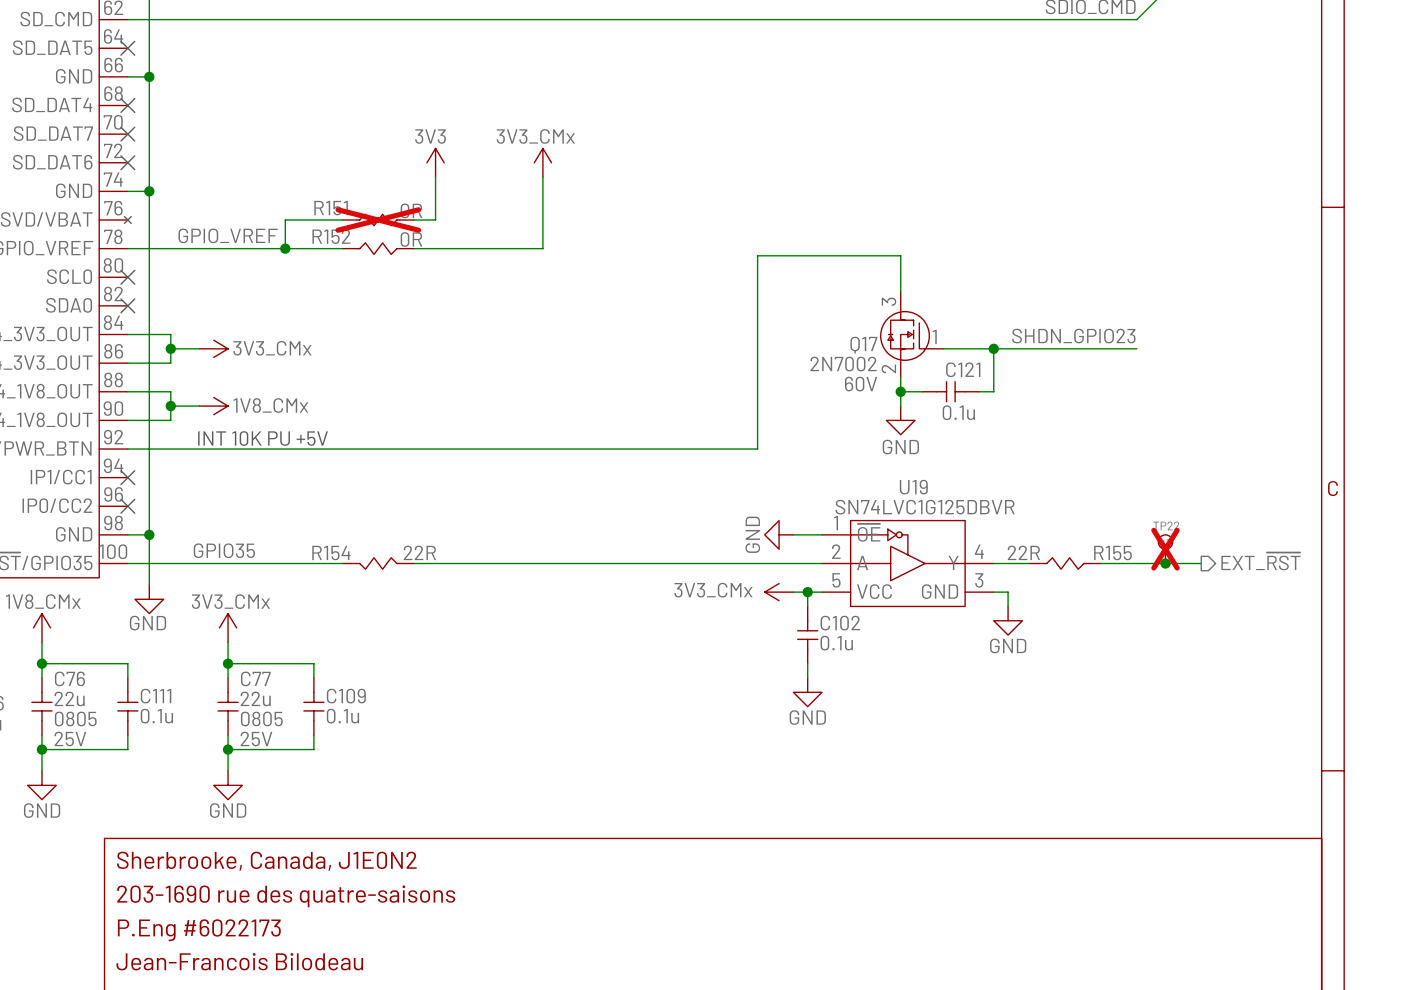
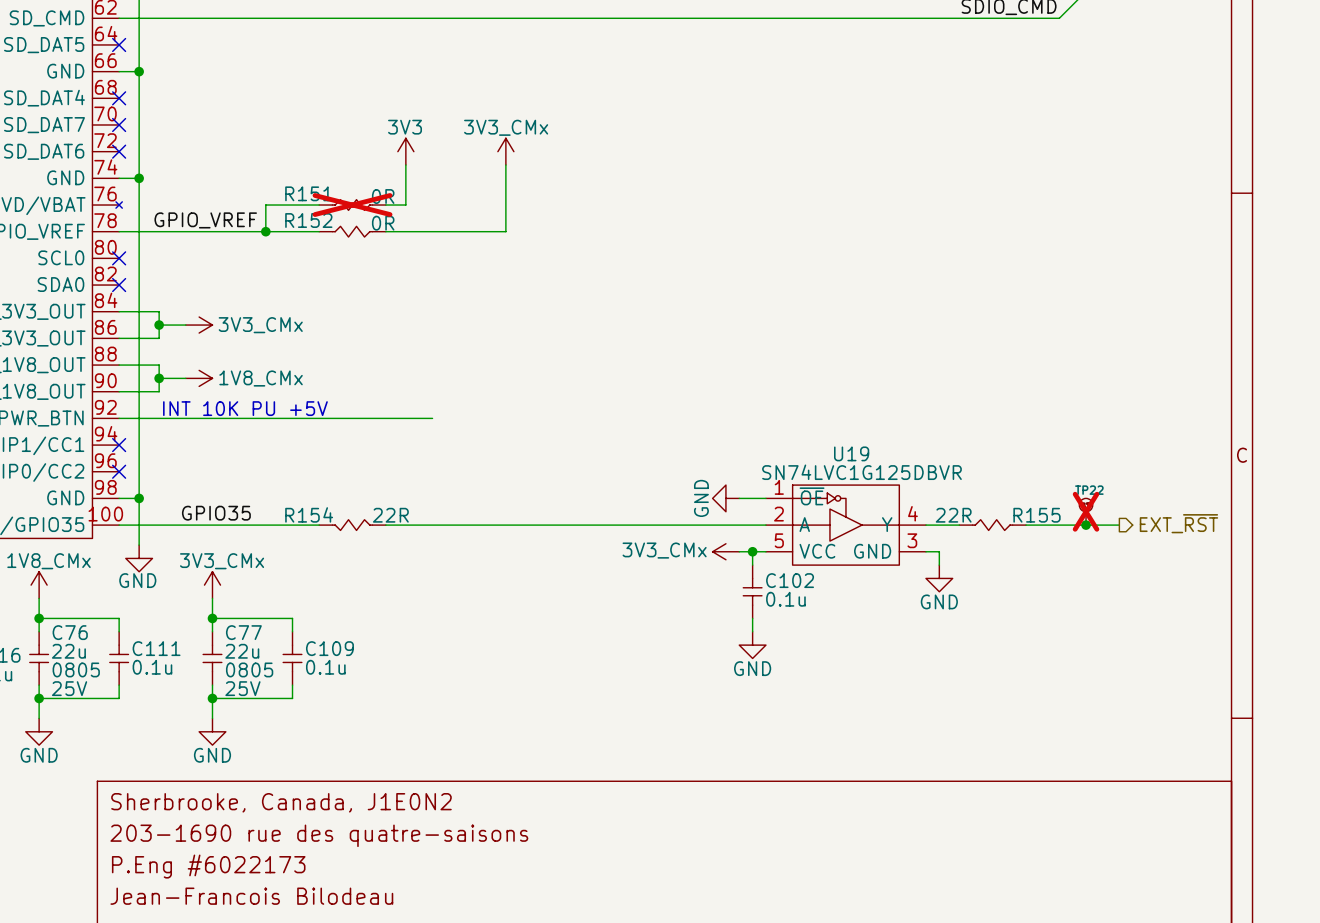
wire: (900, 291) (900, 255) (757, 255) (757, 449) (464, 449) -> none
Q17: 2N7002 (912, 334) -> none
label: SHDN_GPIO23 (1073, 336) -> none
wire: (943, 348) (1136, 348) -> none
wire: (993, 348) (993, 391) (979, 391) -> none
junction: (993, 348) -> none
wire: (900, 377) (900, 406) -> none
wire: (900, 391) (922, 391) -> none
junction: (900, 391) -> none
C121: 0.1u (950, 391) -> none
power symbol: GND (900, 420) -> none

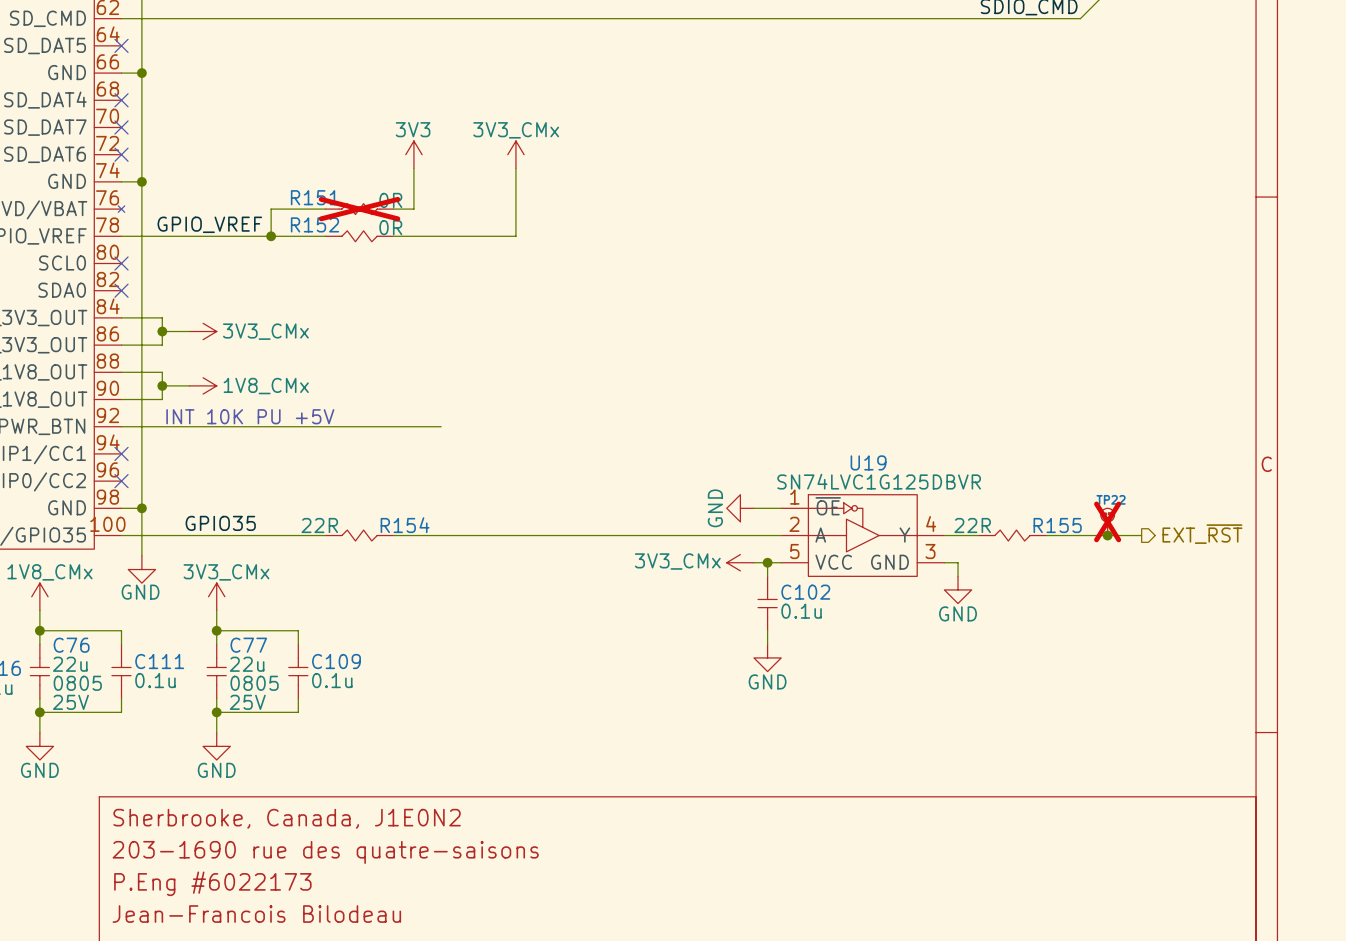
R154 flip: as is (352, 525) -> left-right (359, 535)

